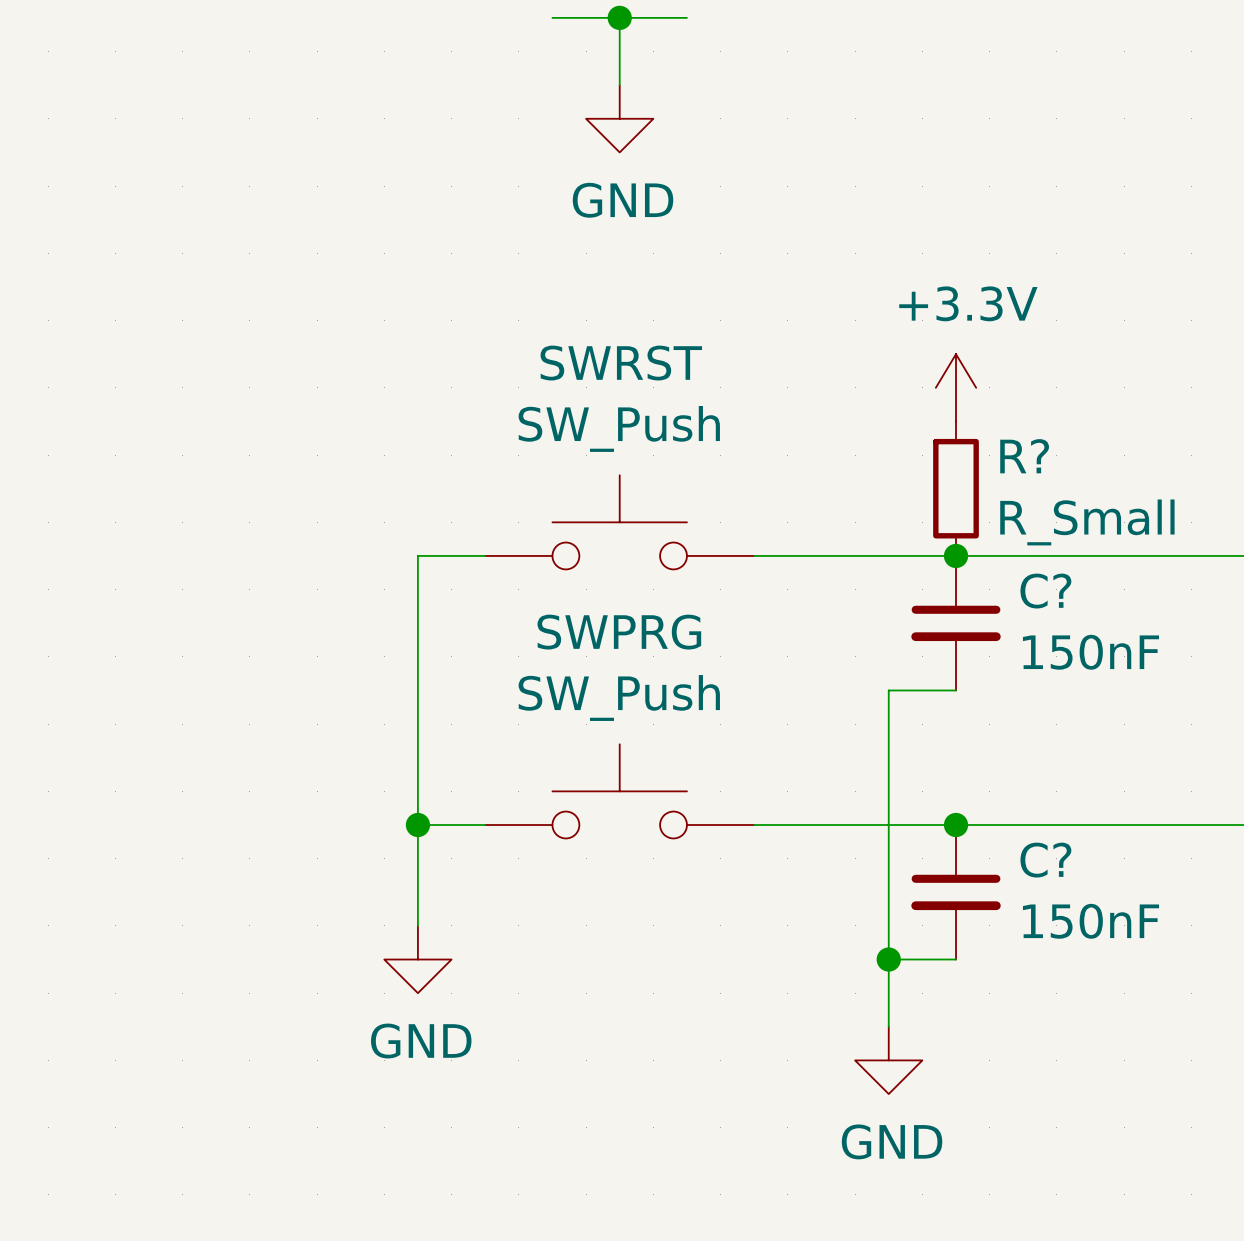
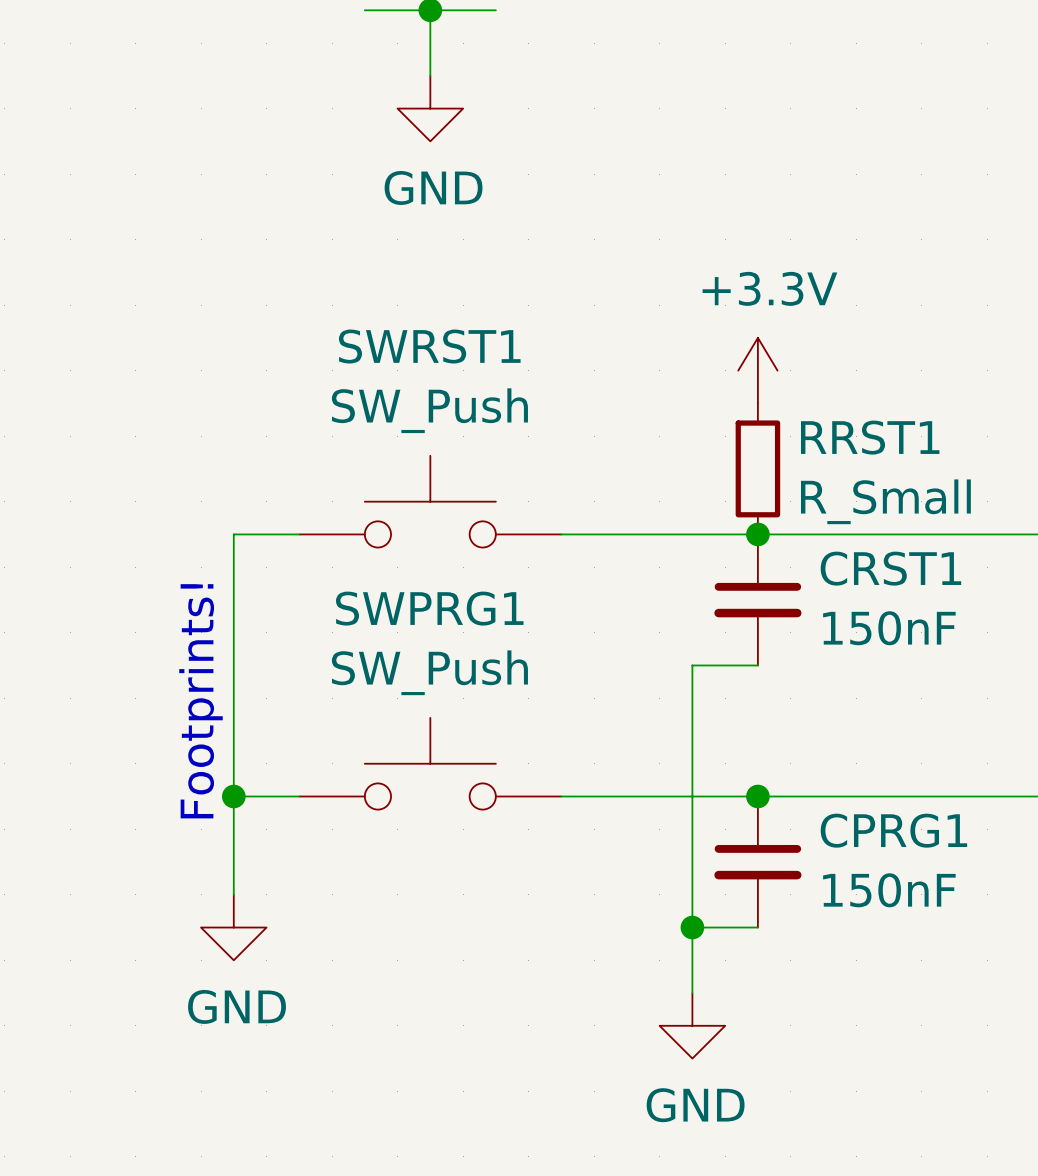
SWRST name: SWRST (621, 363) -> SWRST1 (429, 346)
R? name: R? (1024, 456) -> RRST1 (870, 437)
C? name: C? (1045, 591) -> CRST1 (890, 568)
SWPRG name: SWPRG (619, 632) -> SWPRG1 (429, 608)
text: none -> Footprints! (201, 701)
C? name: C? (1045, 860) -> CPRG1 (893, 830)

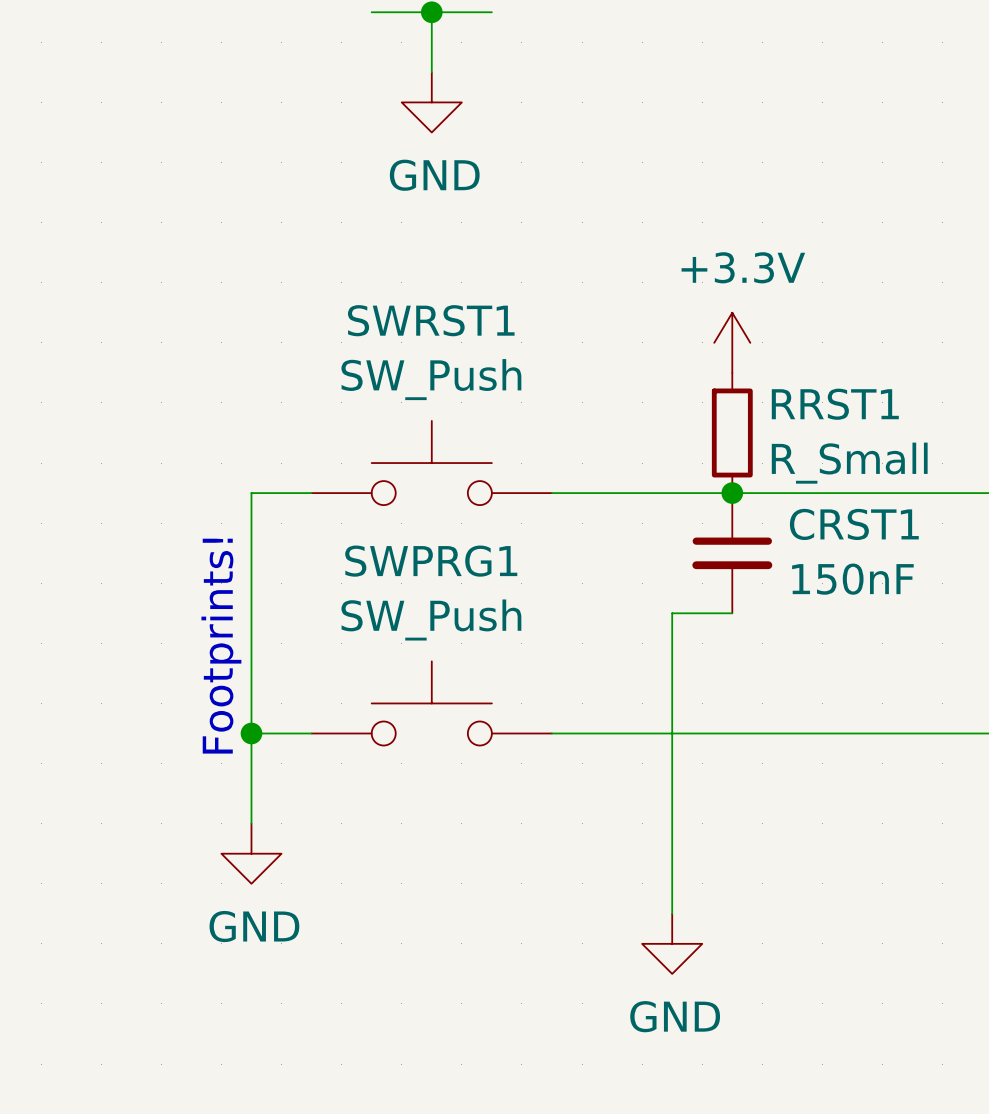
junction: (757, 796) -> none
CPRG1: 150nF (757, 862) -> none
wire: (692, 927) (757, 927) -> none
junction: (692, 927) -> none

